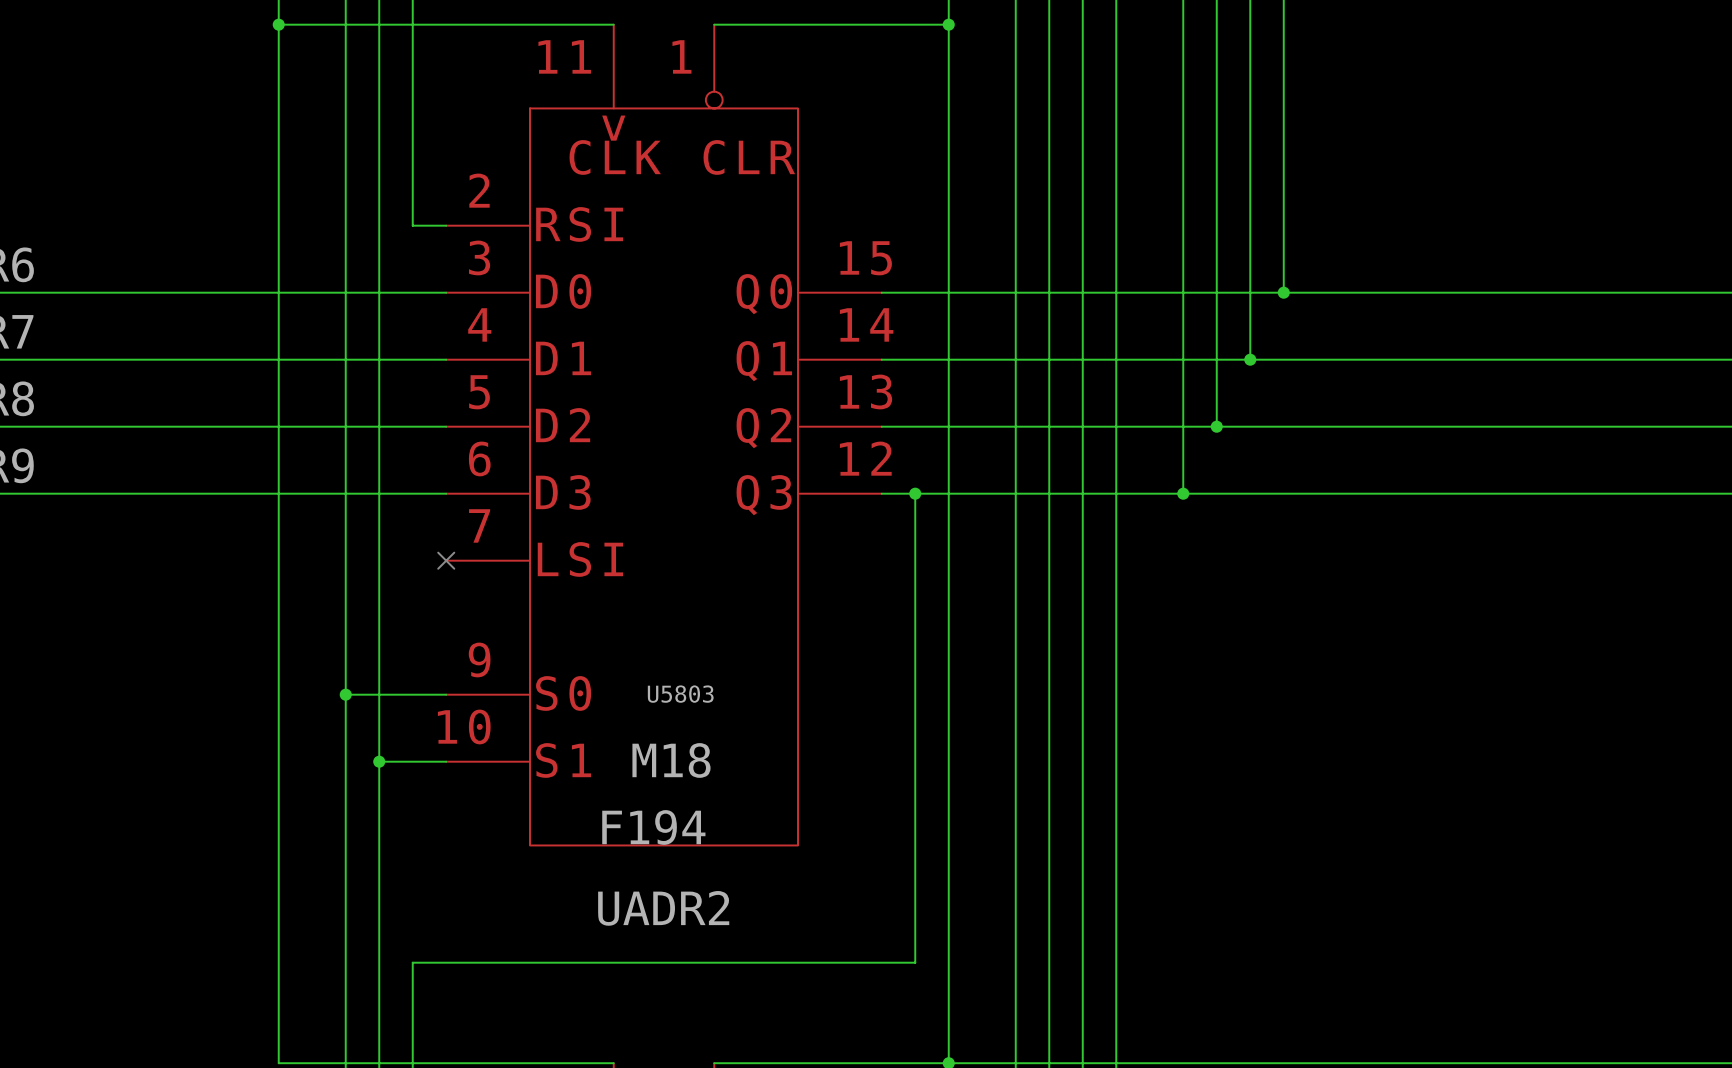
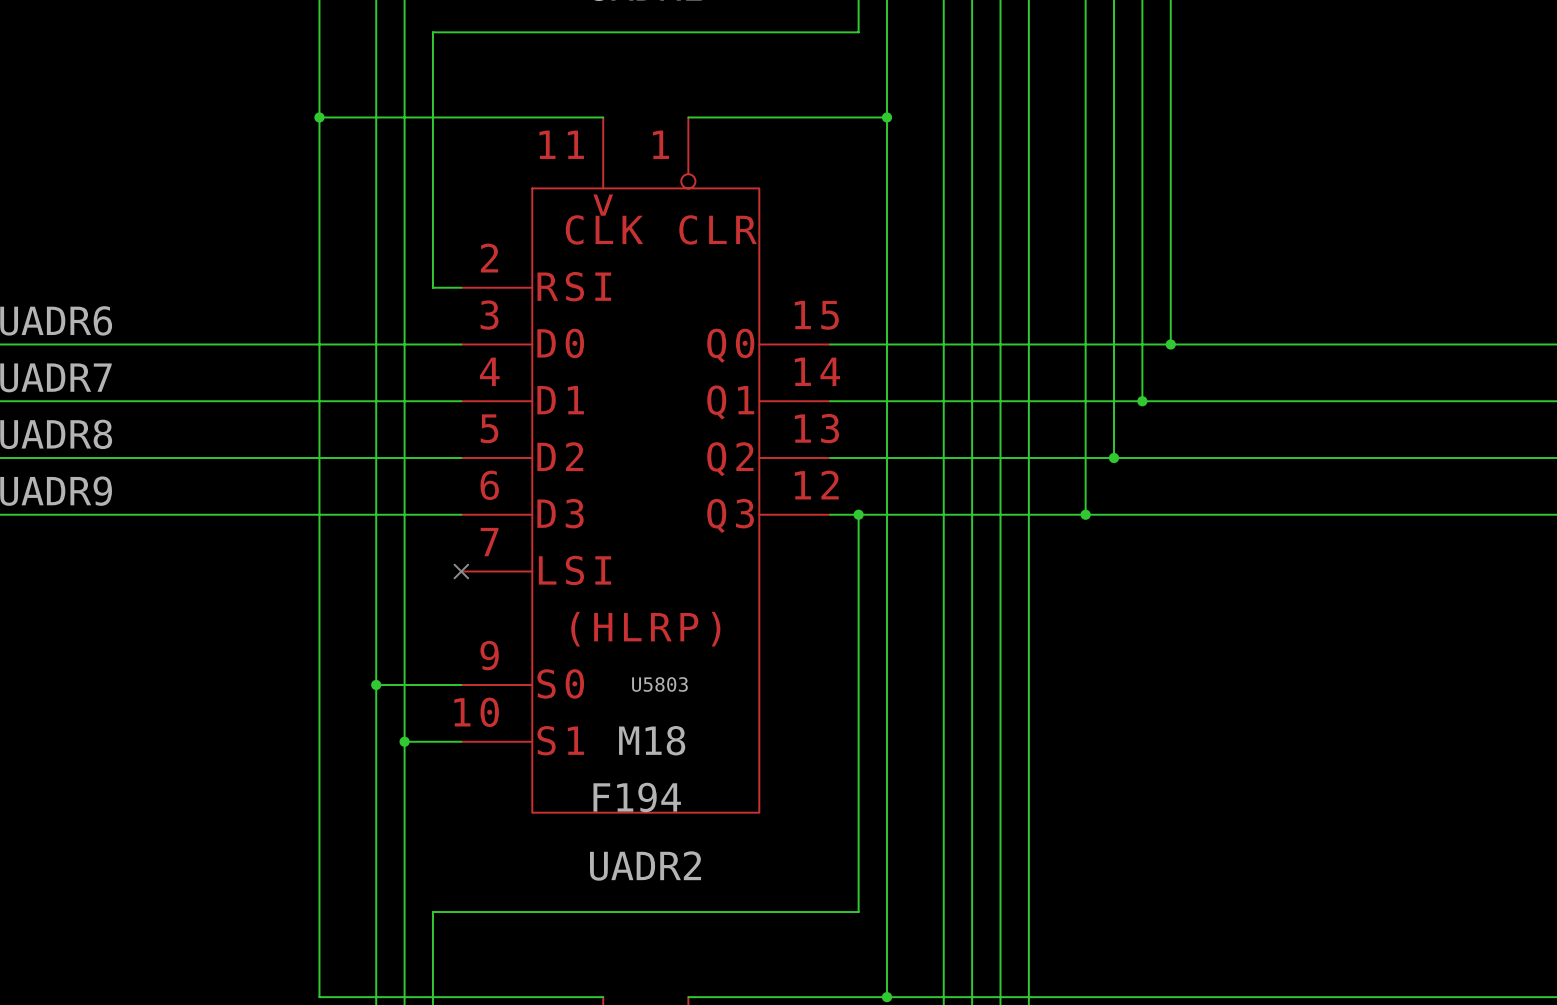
U5803 text: none -> H (603, 627)
U5803 text: none -> L (632, 627)
U5803 text: none -> R (661, 627)
U5803 text: none -> P (689, 627)
U5803 text: none -> ( (575, 629)
U5803 text: none -> ) (715, 629)

